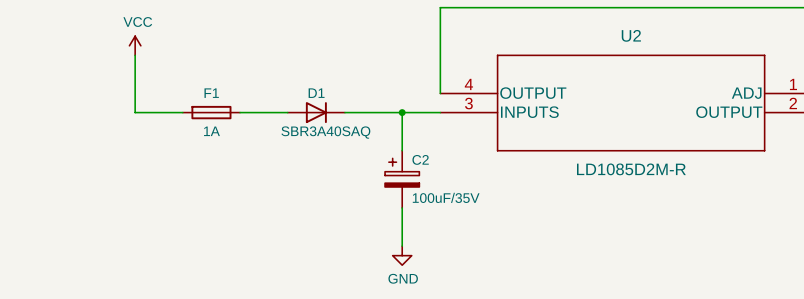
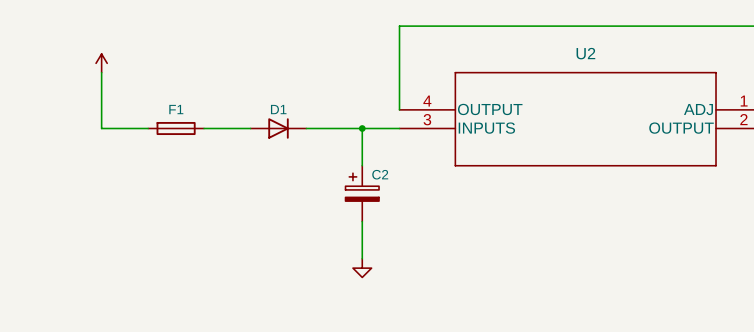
power symbol text: VCC (137, 22) -> none
F1 value: 1A (211, 131) -> none
D1 value: SBR3A40SAQ (325, 132) -> none
U2 value: LD1085D2M-R (631, 169) -> none
C2 value: 100uF/35V (446, 197) -> none
power symbol text: GND (403, 278) -> none

